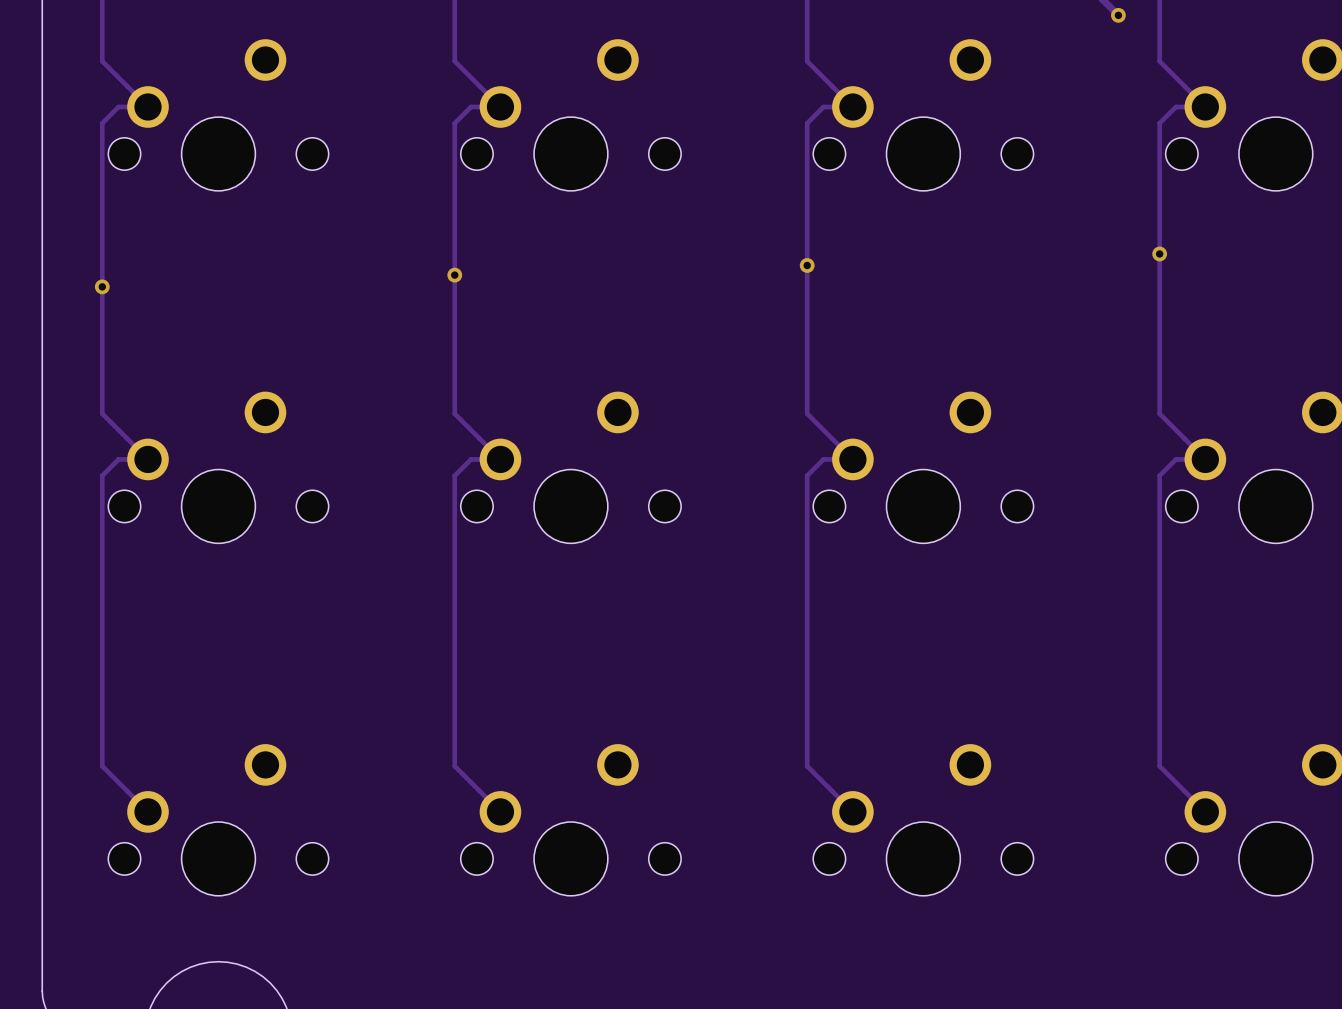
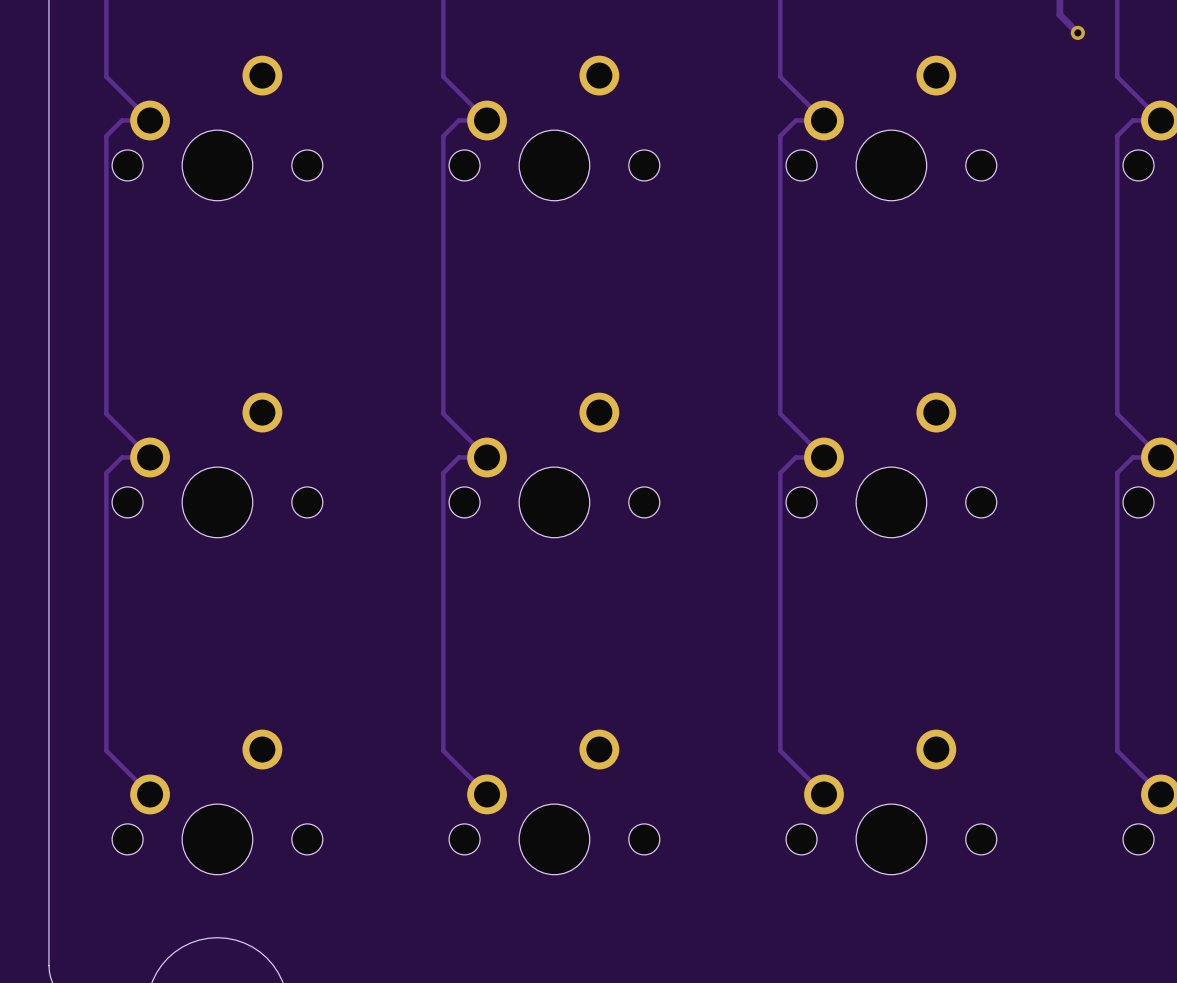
via: (1159, 253) -> none
via: (807, 265) -> none
via: (454, 275) -> none
via: (102, 286) -> none

